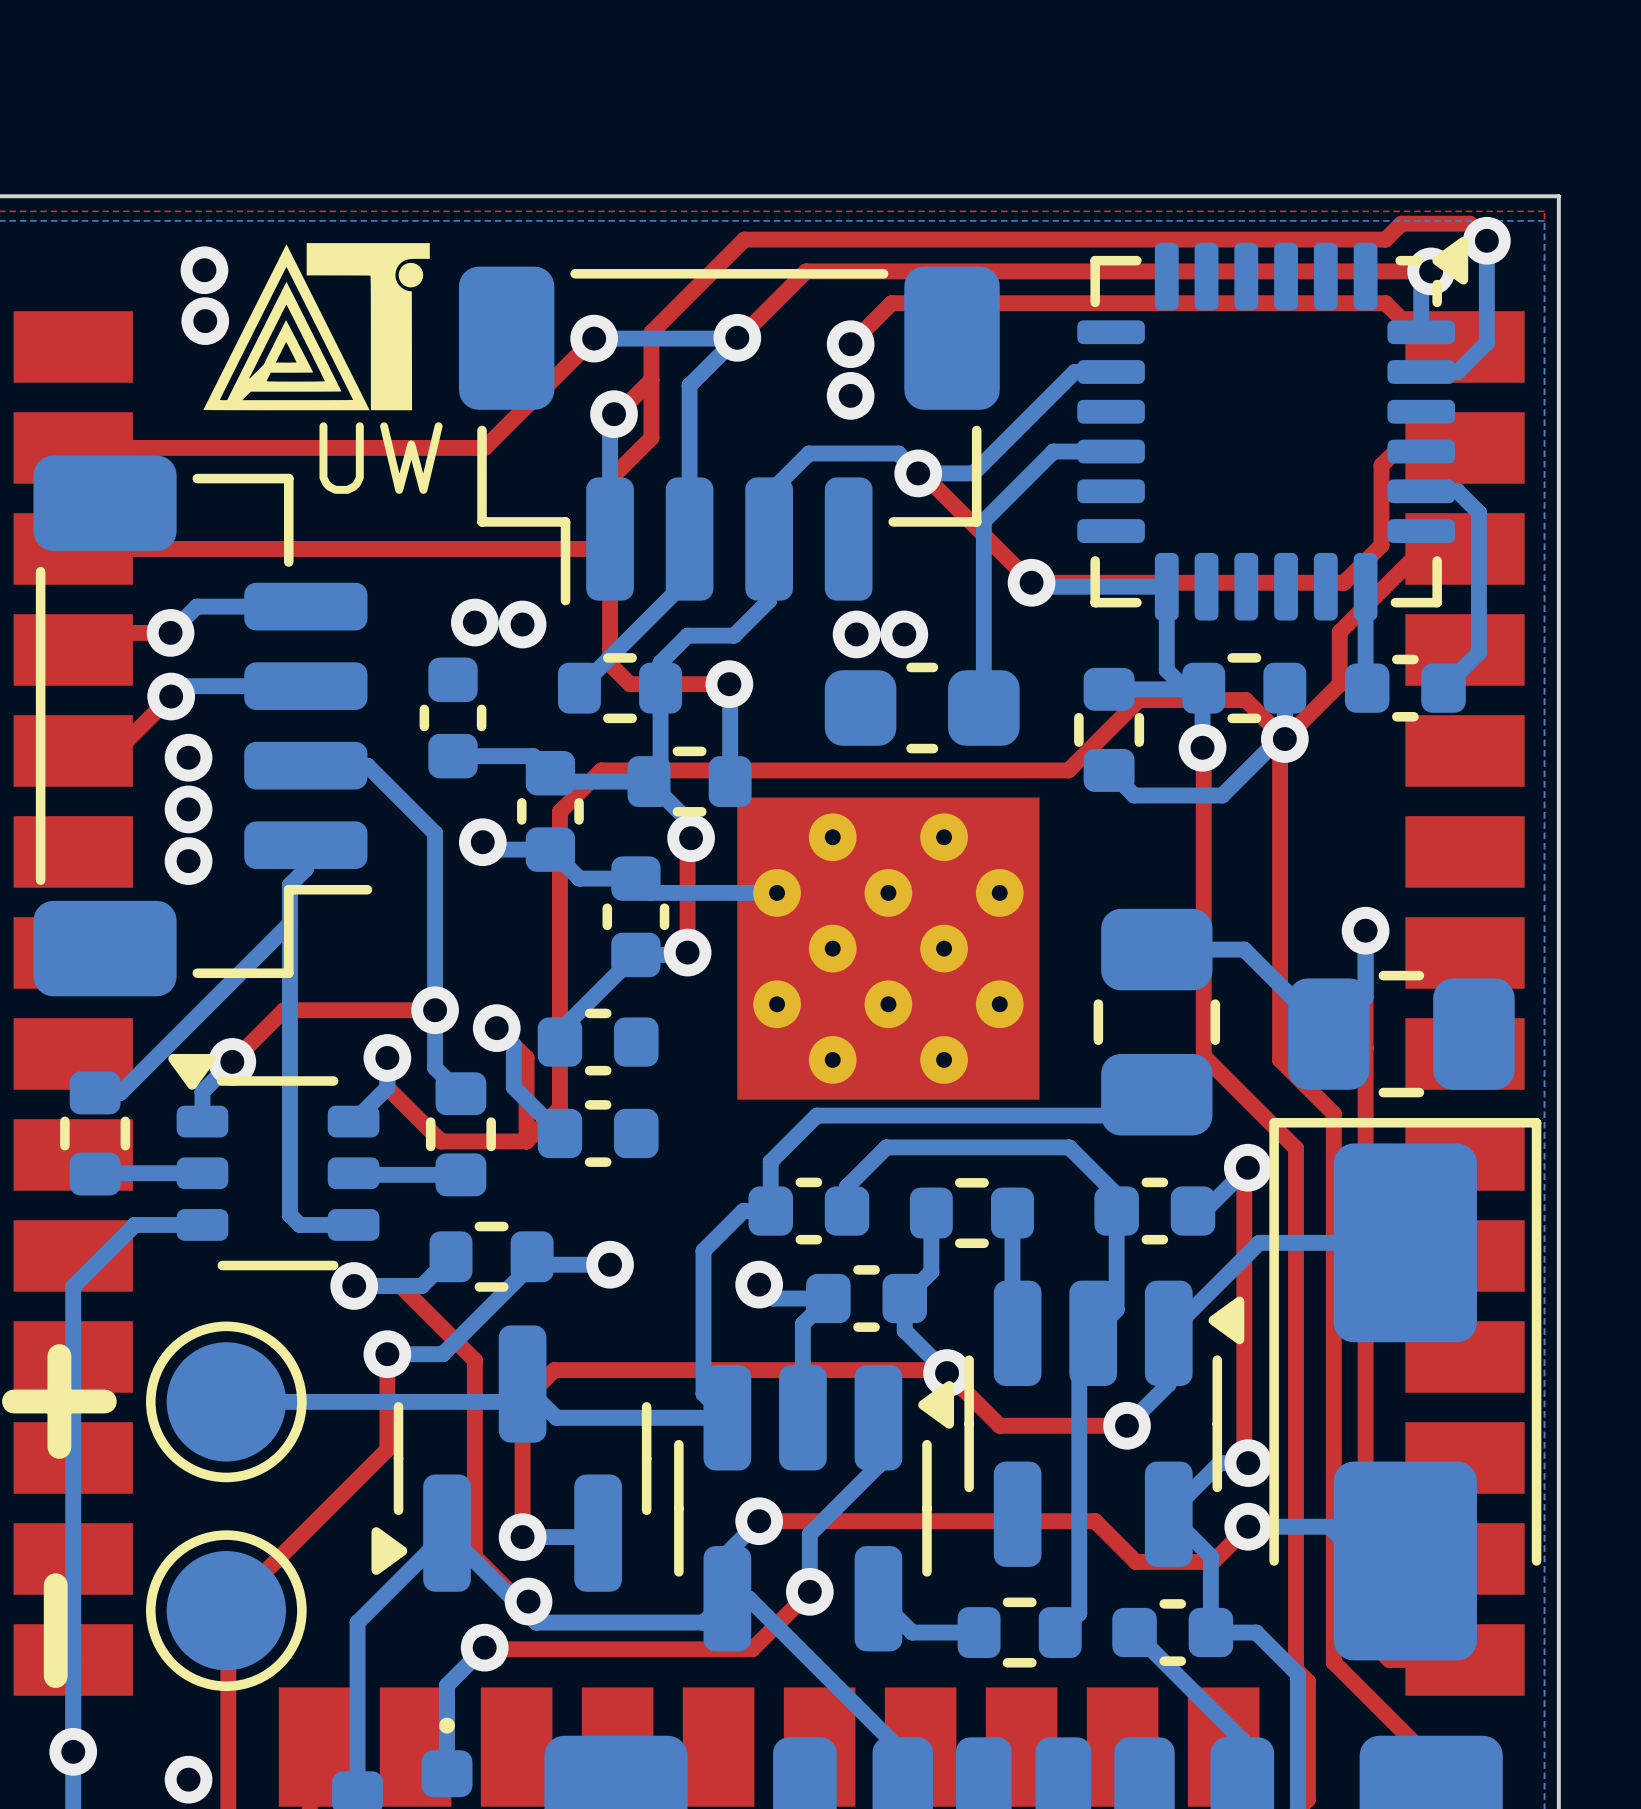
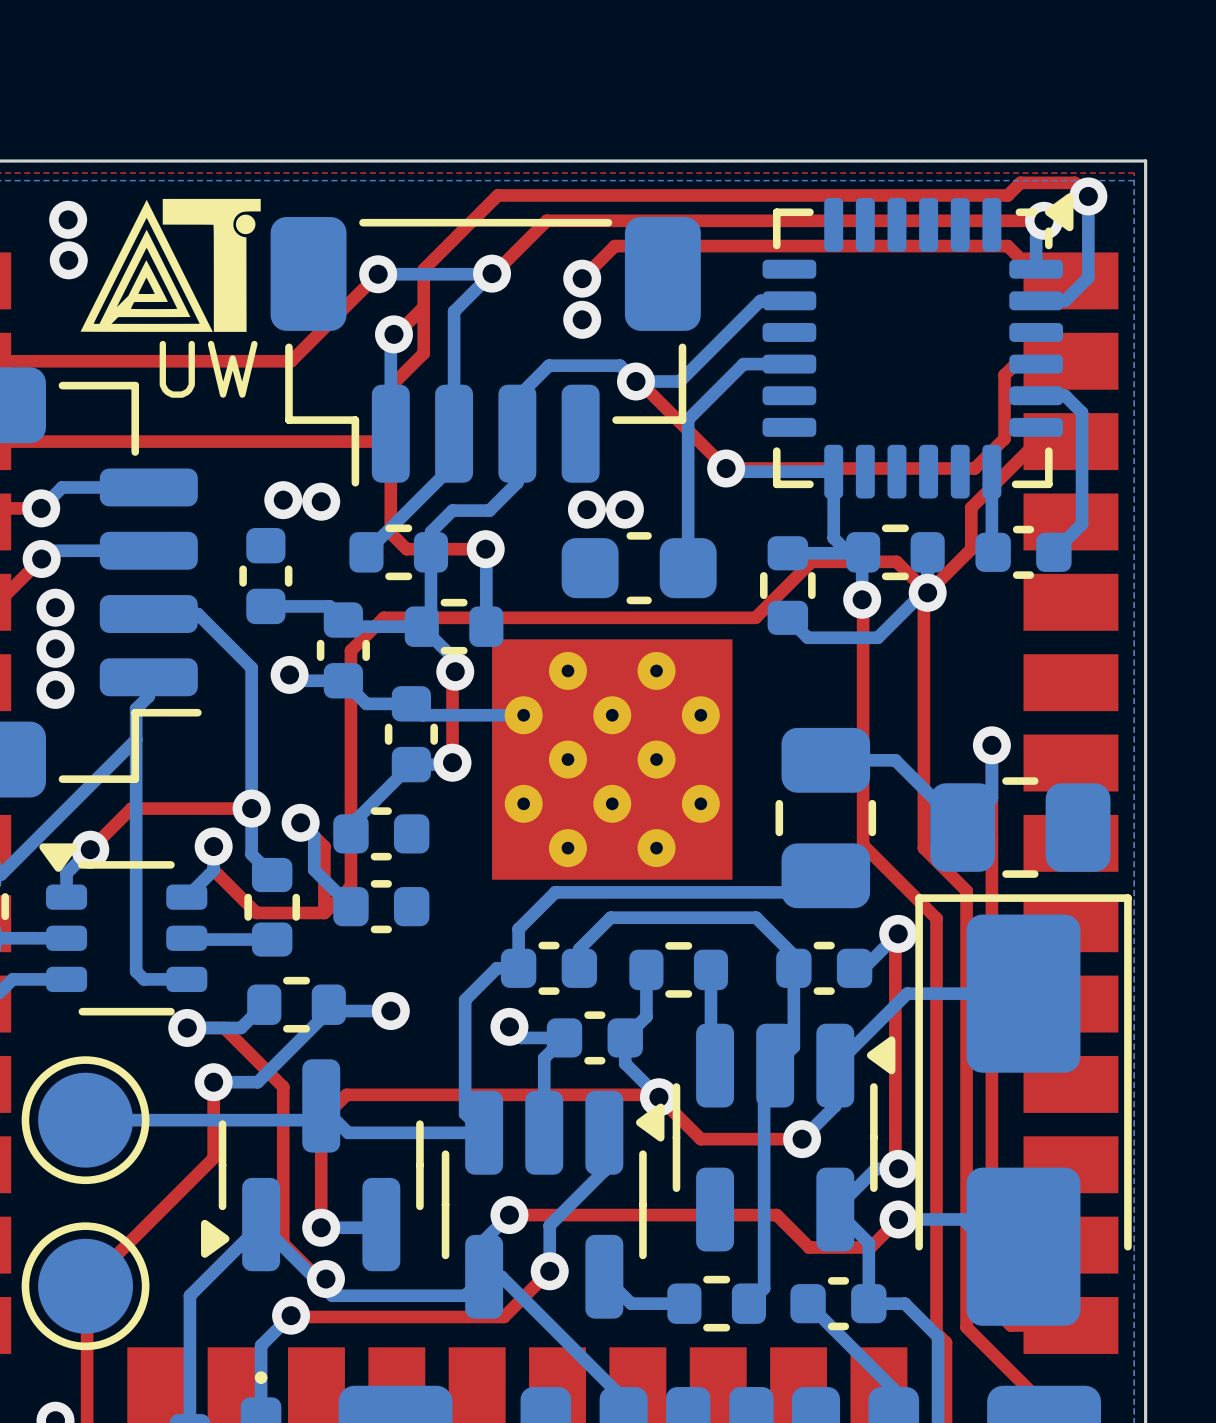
drawing position: (316, 326) -> (170, 265)

